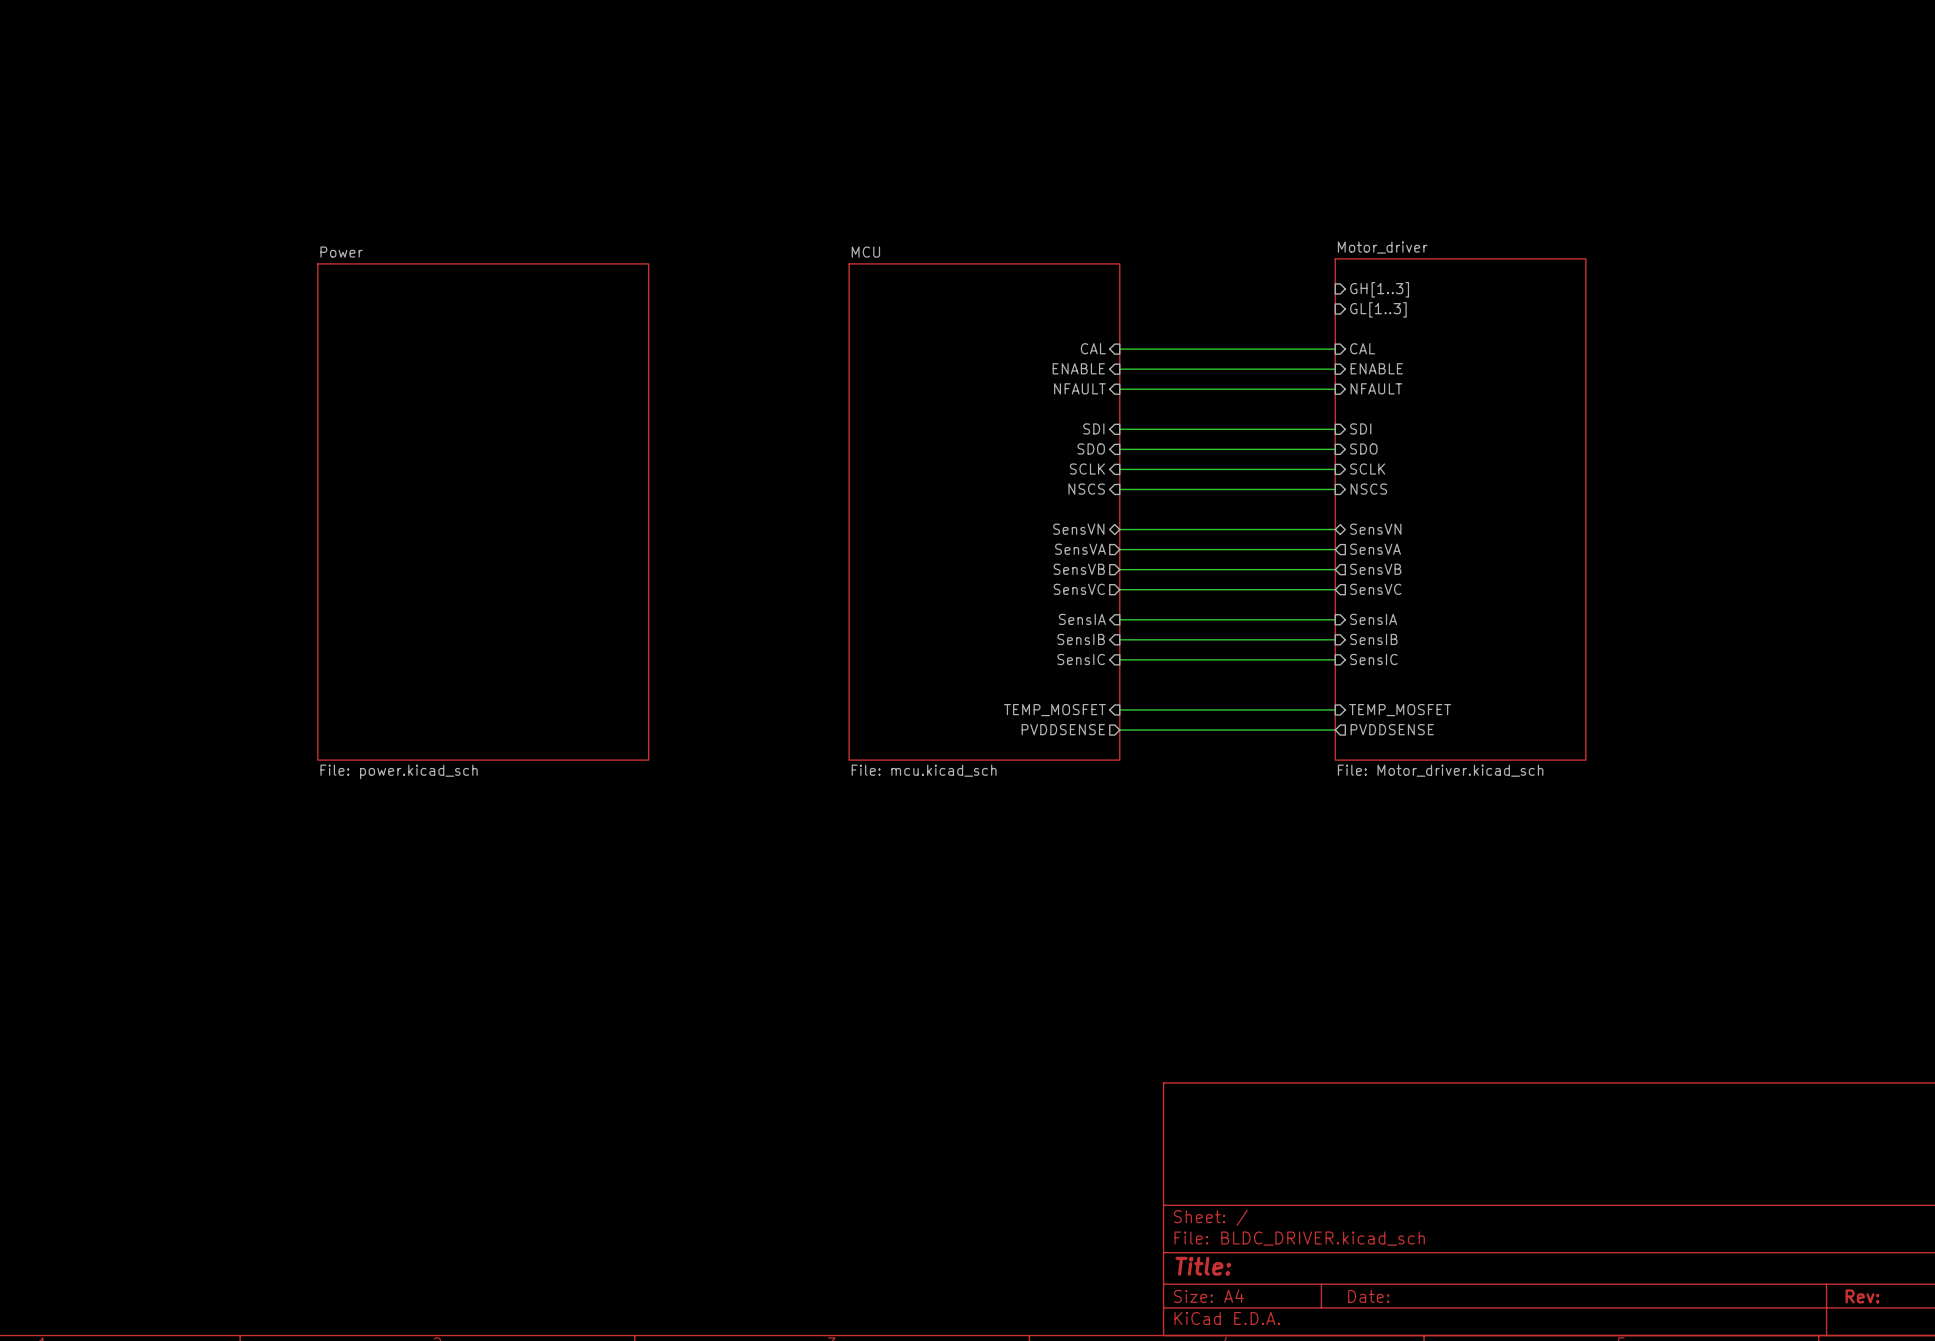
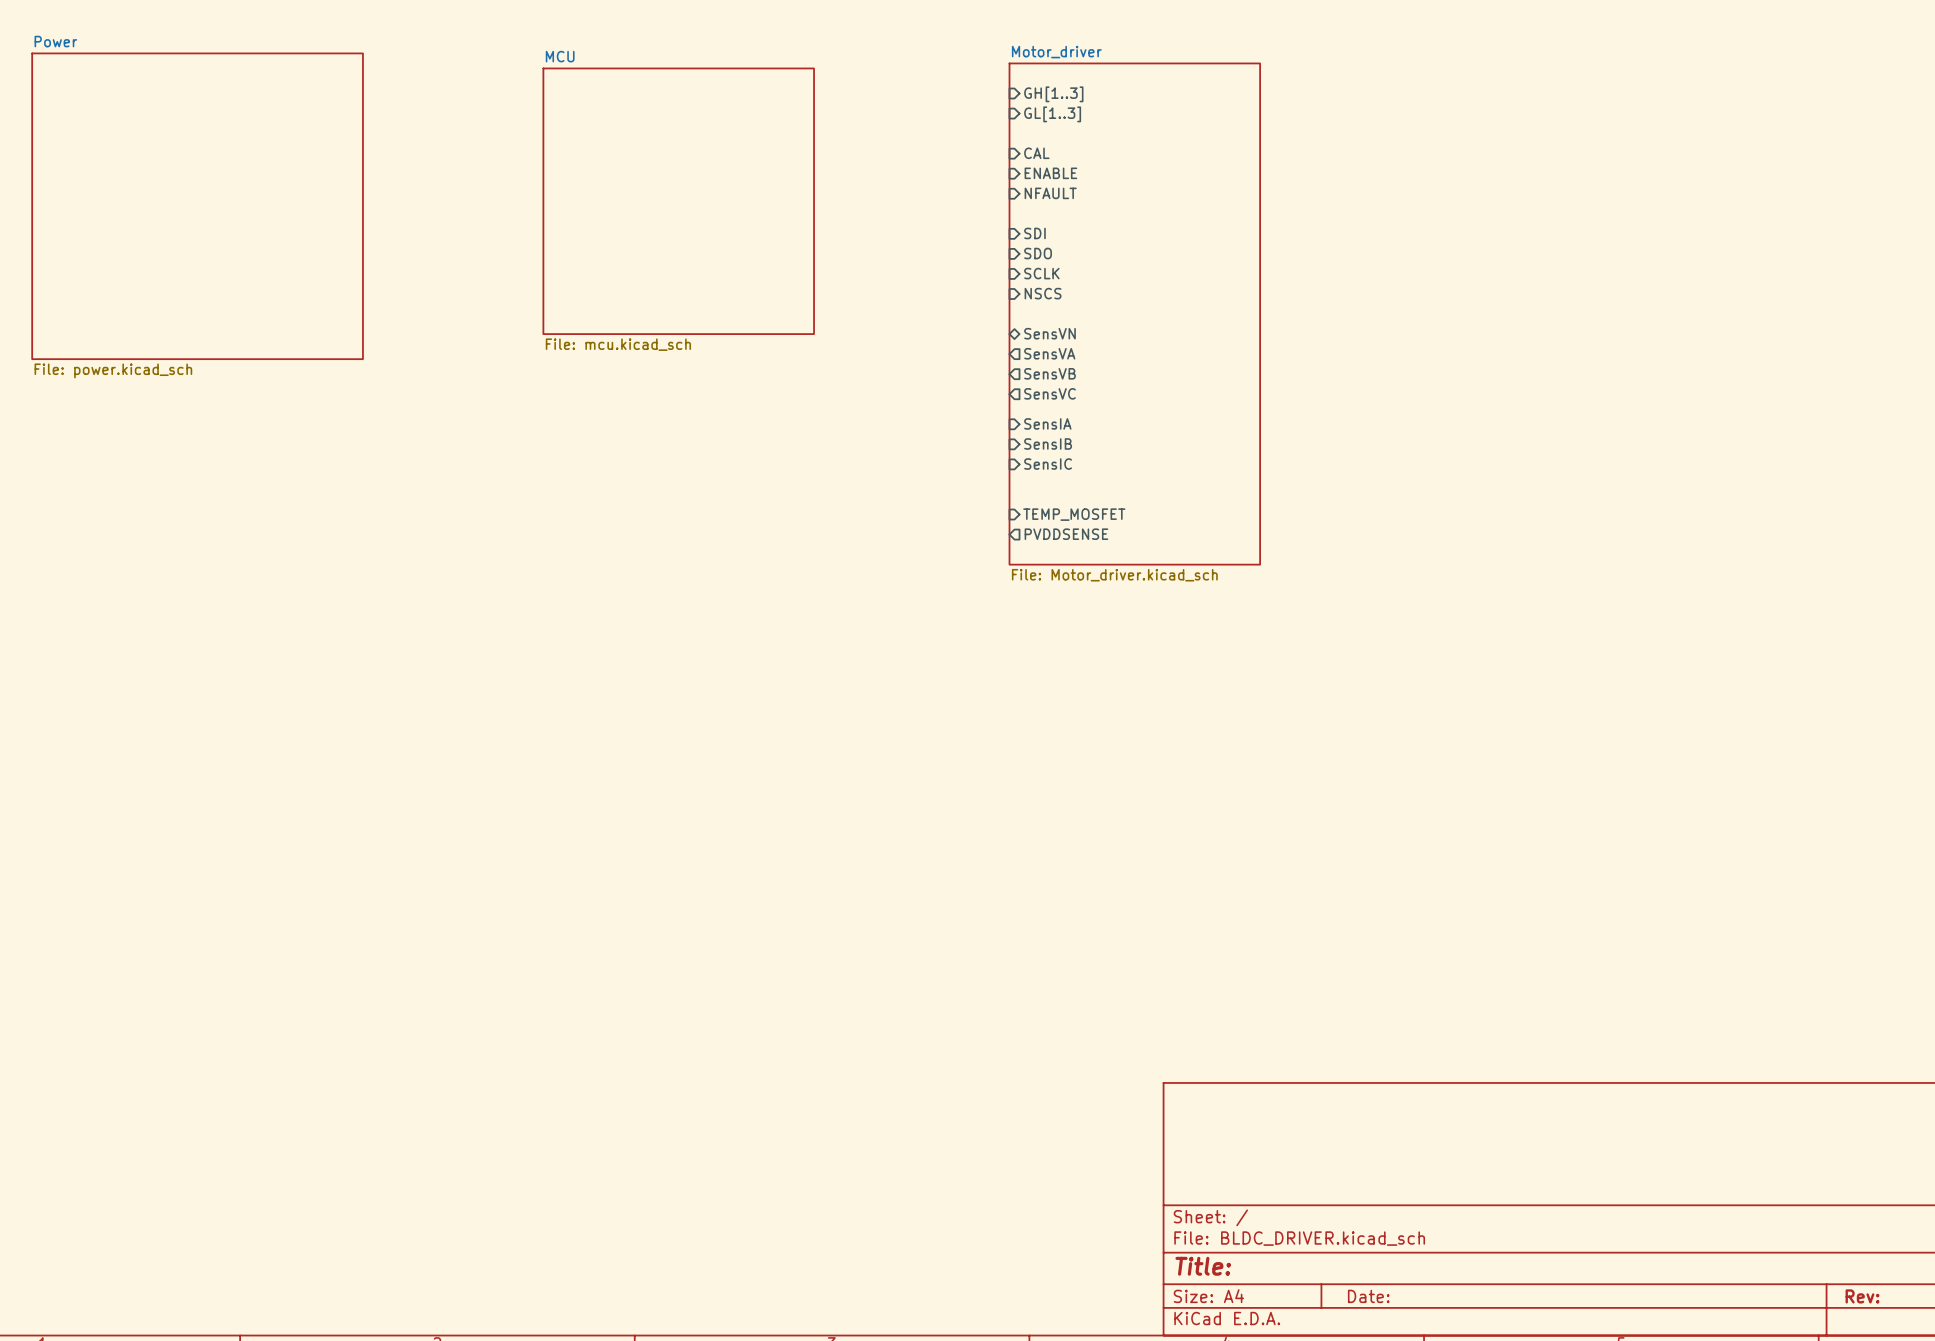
sheet pin: none -> GH[1..3] (1053, 94)
sheet pin: none -> GL[1..3] (1052, 114)
sheet pin: none -> CAL (1036, 153)
sheet pin: none -> ENABLE (1050, 173)
sheet pin: none -> NFAULT (1050, 193)
sheet MCU: none -> File: mcu.kicad_sch (678, 201)
sheet Power: none -> File: power.kicad_sch (197, 206)
sheet pin: none -> SDI (1034, 233)
sheet pin: none -> SDO (1038, 253)
sheet pin: none -> SCLK (1041, 273)
sheet pin: GH[1..3] (1379, 289) -> none
sheet pin: none -> NSCS (1043, 293)
sheet pin: GL[1..3] (1378, 309) -> none
sheet Motor_driver: none -> File: Motor_driver.kicad_sch (1134, 314)
sheet pin: none -> SensVN (1049, 333)
sheet pin: CAL (1093, 348) -> none
sheet pin: CAL (1362, 348) -> none
wire: (1119, 349) (1335, 349) -> none
sheet pin: none -> SensVA (1049, 353)
sheet pin: ENABLE (1078, 368) -> none
sheet pin: ENABLE (1376, 368) -> none
wire: (1119, 369) (1335, 369) -> none
sheet pin: none -> SensVB (1049, 373)
sheet pin: NFAULT (1079, 388) -> none
sheet pin: NFAULT (1376, 388) -> none
wire: (1119, 389) (1335, 389) -> none
sheet pin: none -> SensVC (1049, 393)
sheet pin: none -> SensIA (1047, 423)
sheet pin: SDI (1093, 428) -> none
sheet pin: SDI (1360, 428) -> none
wire: (1119, 429) (1335, 429) -> none
sheet pin: none -> SensIB (1048, 443)
sheet pin: SDO (1091, 448) -> none
sheet pin: SDO (1363, 448) -> none
wire: (1119, 449) (1335, 449) -> none
sheet pin: none -> SensIC (1048, 464)
sheet pin: SCLK (1087, 469) -> none
wire: (1119, 469) (1335, 469) -> none
sheet pin: SCLK (1367, 469) -> none
sheet pin: NSCS (1086, 489) -> none
wire: (1119, 489) (1335, 489) -> none
sheet pin: NSCS (1368, 489) -> none
sheet Motor_driver: File: Motor_driver.kicad_sch (1460, 509) -> none
sheet Power: File: power.kicad_sch (483, 512) -> none
sheet MCU: File: mcu.kicad_sch (984, 512) -> none
sheet pin: none -> TEMP_MOSFET (1074, 514)
sheet pin: SensVN (1078, 529) -> none
wire: (1119, 529) (1335, 529) -> none
sheet pin: SensVN (1375, 529) -> none
sheet pin: none -> PVDDSENSE (1066, 534)
sheet pin: SensVA (1080, 549) -> none
wire: (1119, 549) (1335, 549) -> none
sheet pin: SensVA (1375, 549) -> none
sheet pin: SensVB (1079, 569) -> none
wire: (1119, 569) (1335, 569) -> none
sheet pin: SensVB (1375, 569) -> none
sheet pin: SensVC (1079, 589) -> none
wire: (1119, 589) (1335, 589) -> none
sheet pin: SensVC (1375, 589) -> none
sheet pin: SensIA (1082, 619) -> none
wire: (1119, 619) (1335, 619) -> none
sheet pin: SensIA (1373, 619) -> none
sheet pin: SensIB (1081, 639) -> none
wire: (1119, 639) (1335, 639) -> none
sheet pin: SensIB (1373, 639) -> none
sheet pin: SensIC (1081, 659) -> none
wire: (1119, 659) (1335, 659) -> none
sheet pin: SensIC (1373, 659) -> none
wire: (1119, 709) (1335, 709) -> none
sheet pin: TEMP_MOSFET (1054, 710) -> none
sheet pin: TEMP_MOSFET (1400, 710) -> none
sheet pin: PVDDSENSE (1063, 729) -> none
sheet pin: PVDDSENSE (1392, 729) -> none
wire: (1119, 730) (1335, 730) -> none

